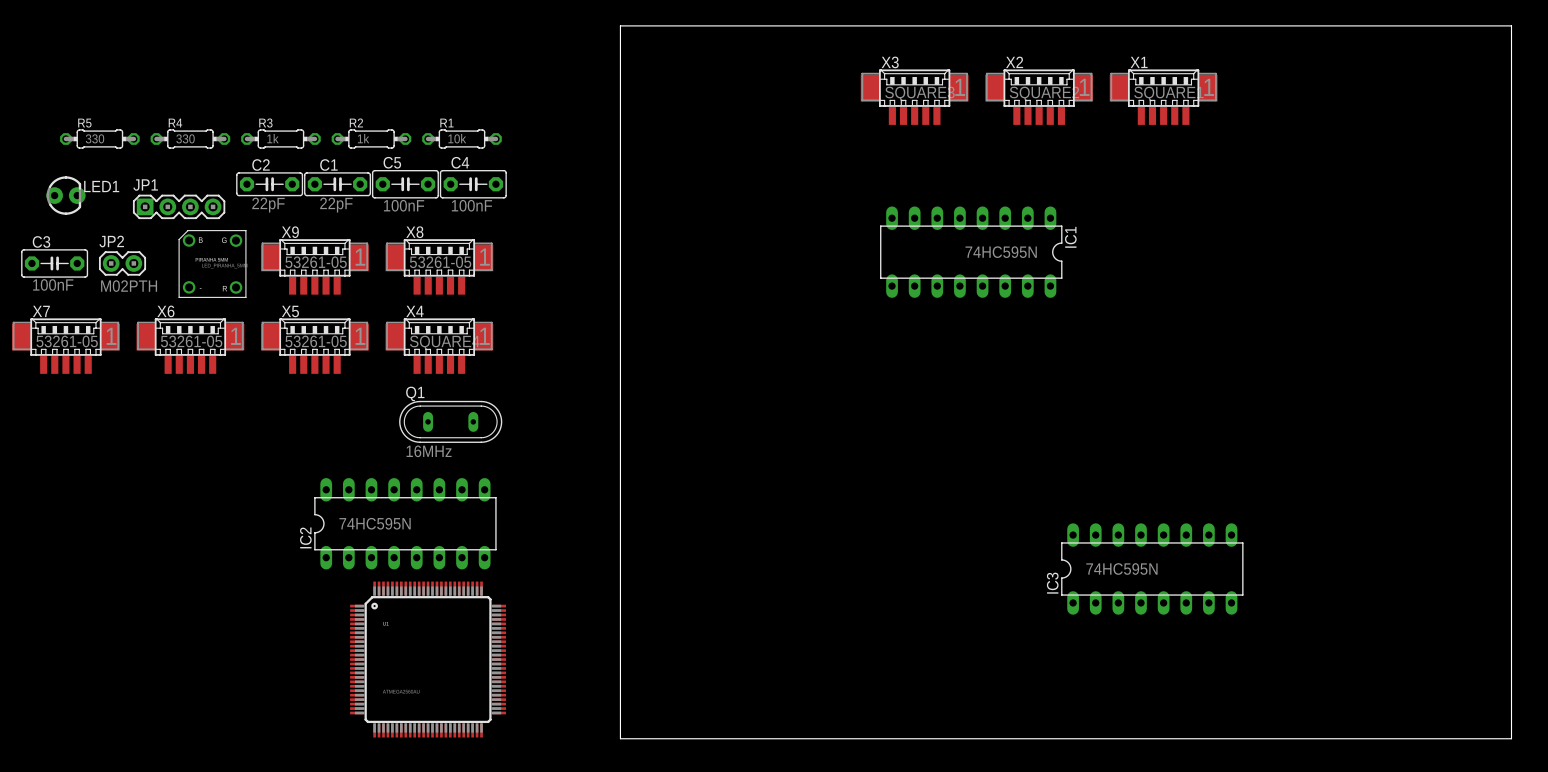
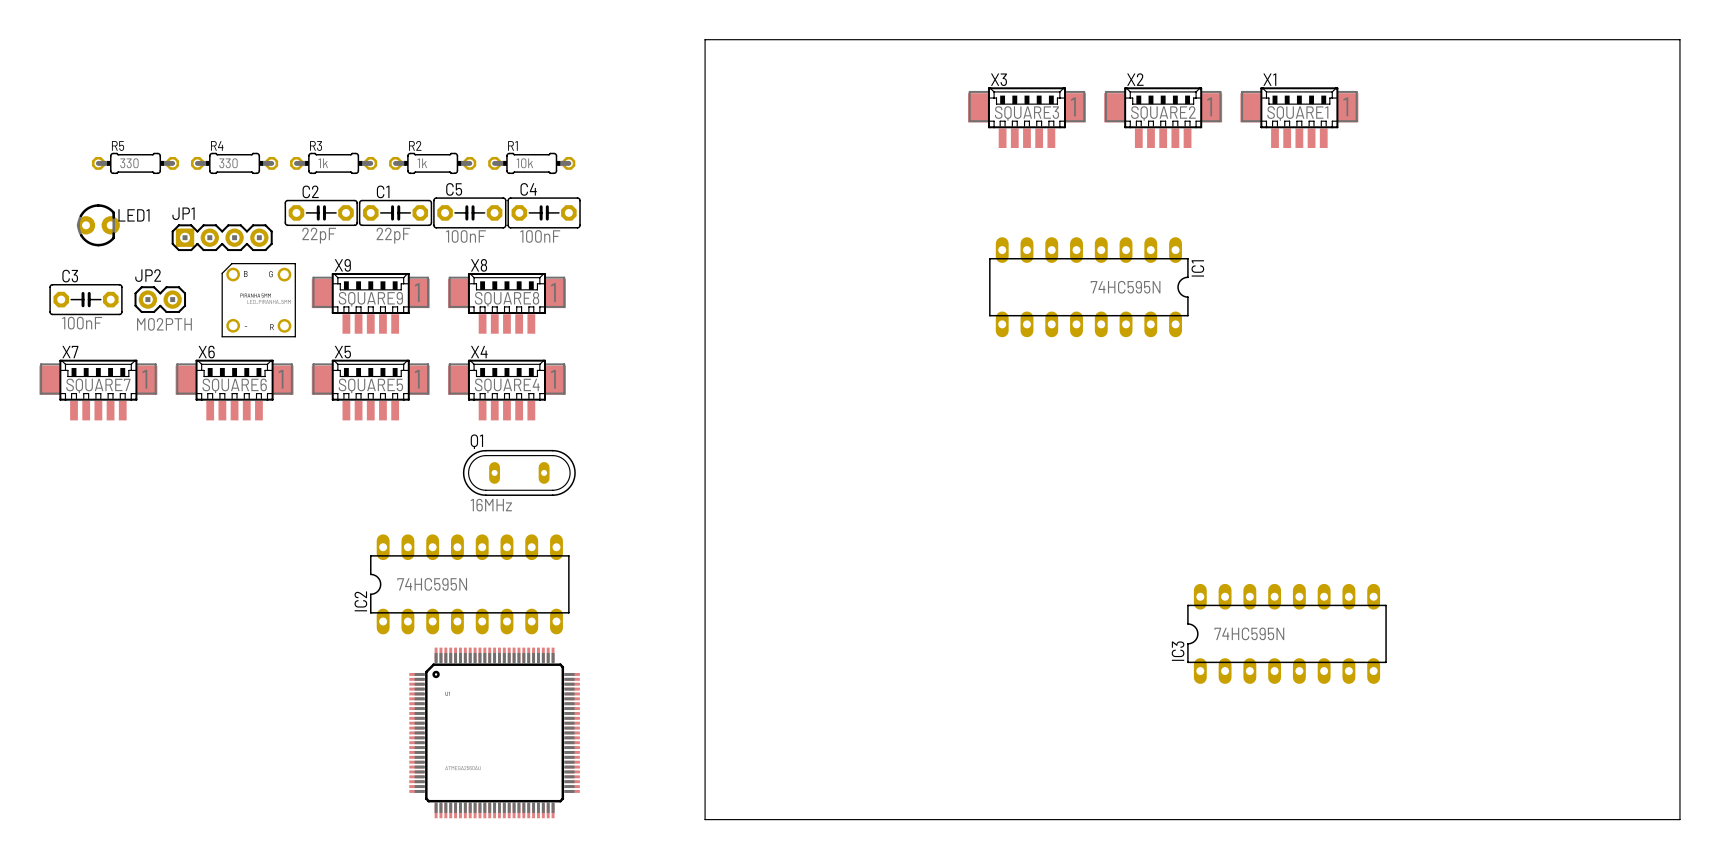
X9 value: 53261-05 (316, 262) -> SQUARE9 (370, 299)
X8 value: 53261-05 (440, 262) -> SQUARE8 (507, 299)
X7 value: 53261-05 (67, 341) -> SQUARE7 (98, 385)
X6 value: 53261-05 (191, 341) -> SQUARE6 (234, 385)
X5 value: 53261-05 (316, 341) -> SQUARE5 (370, 385)

